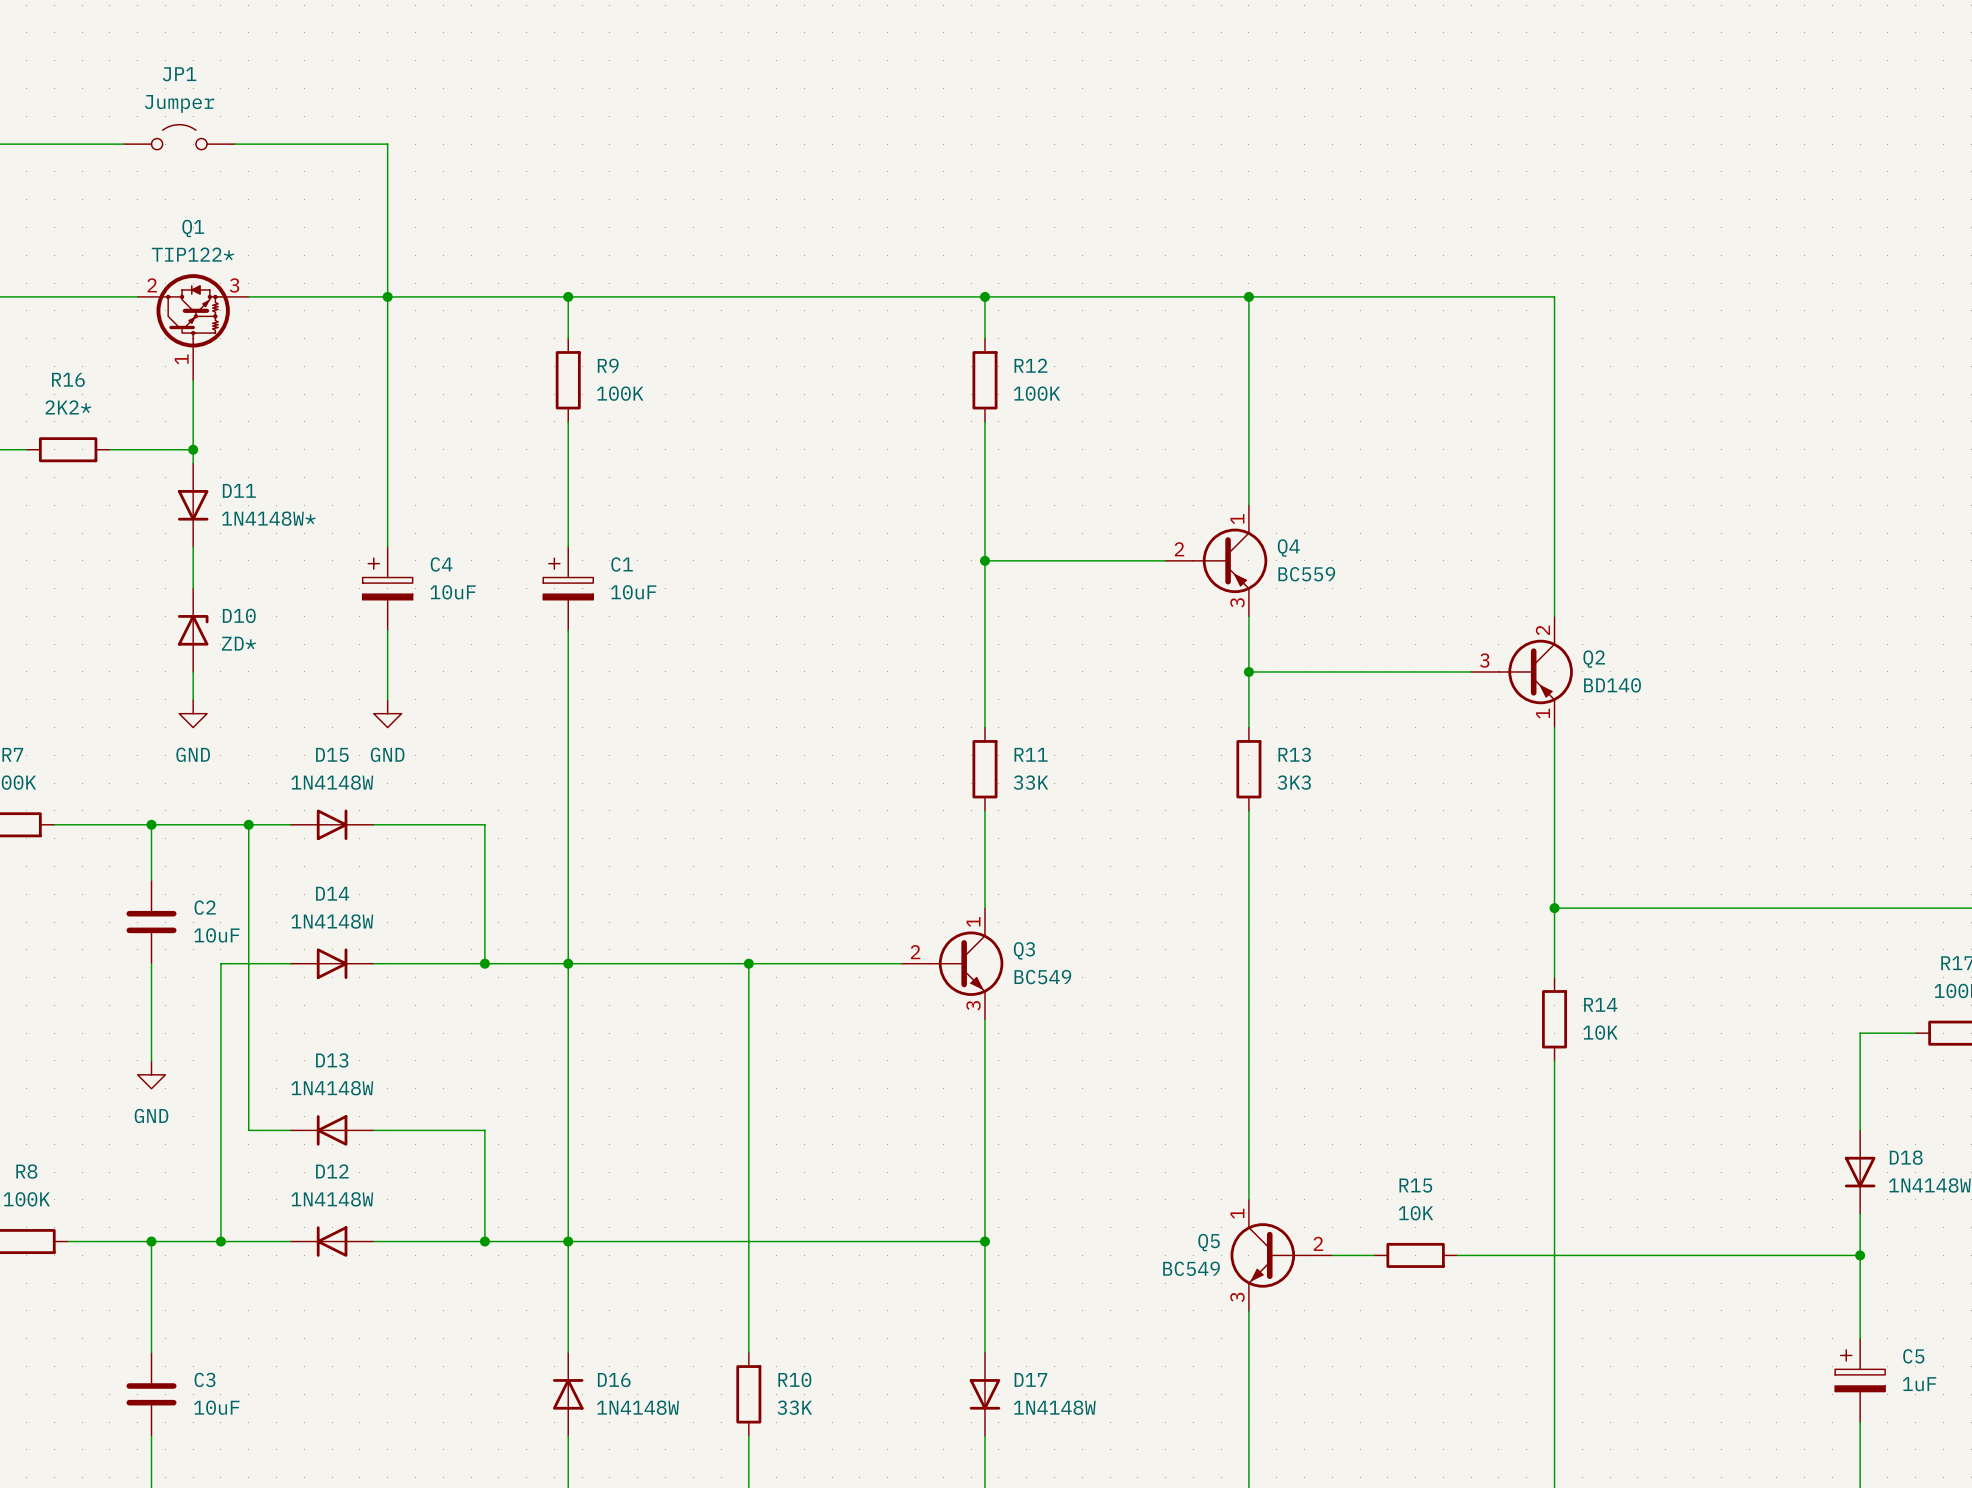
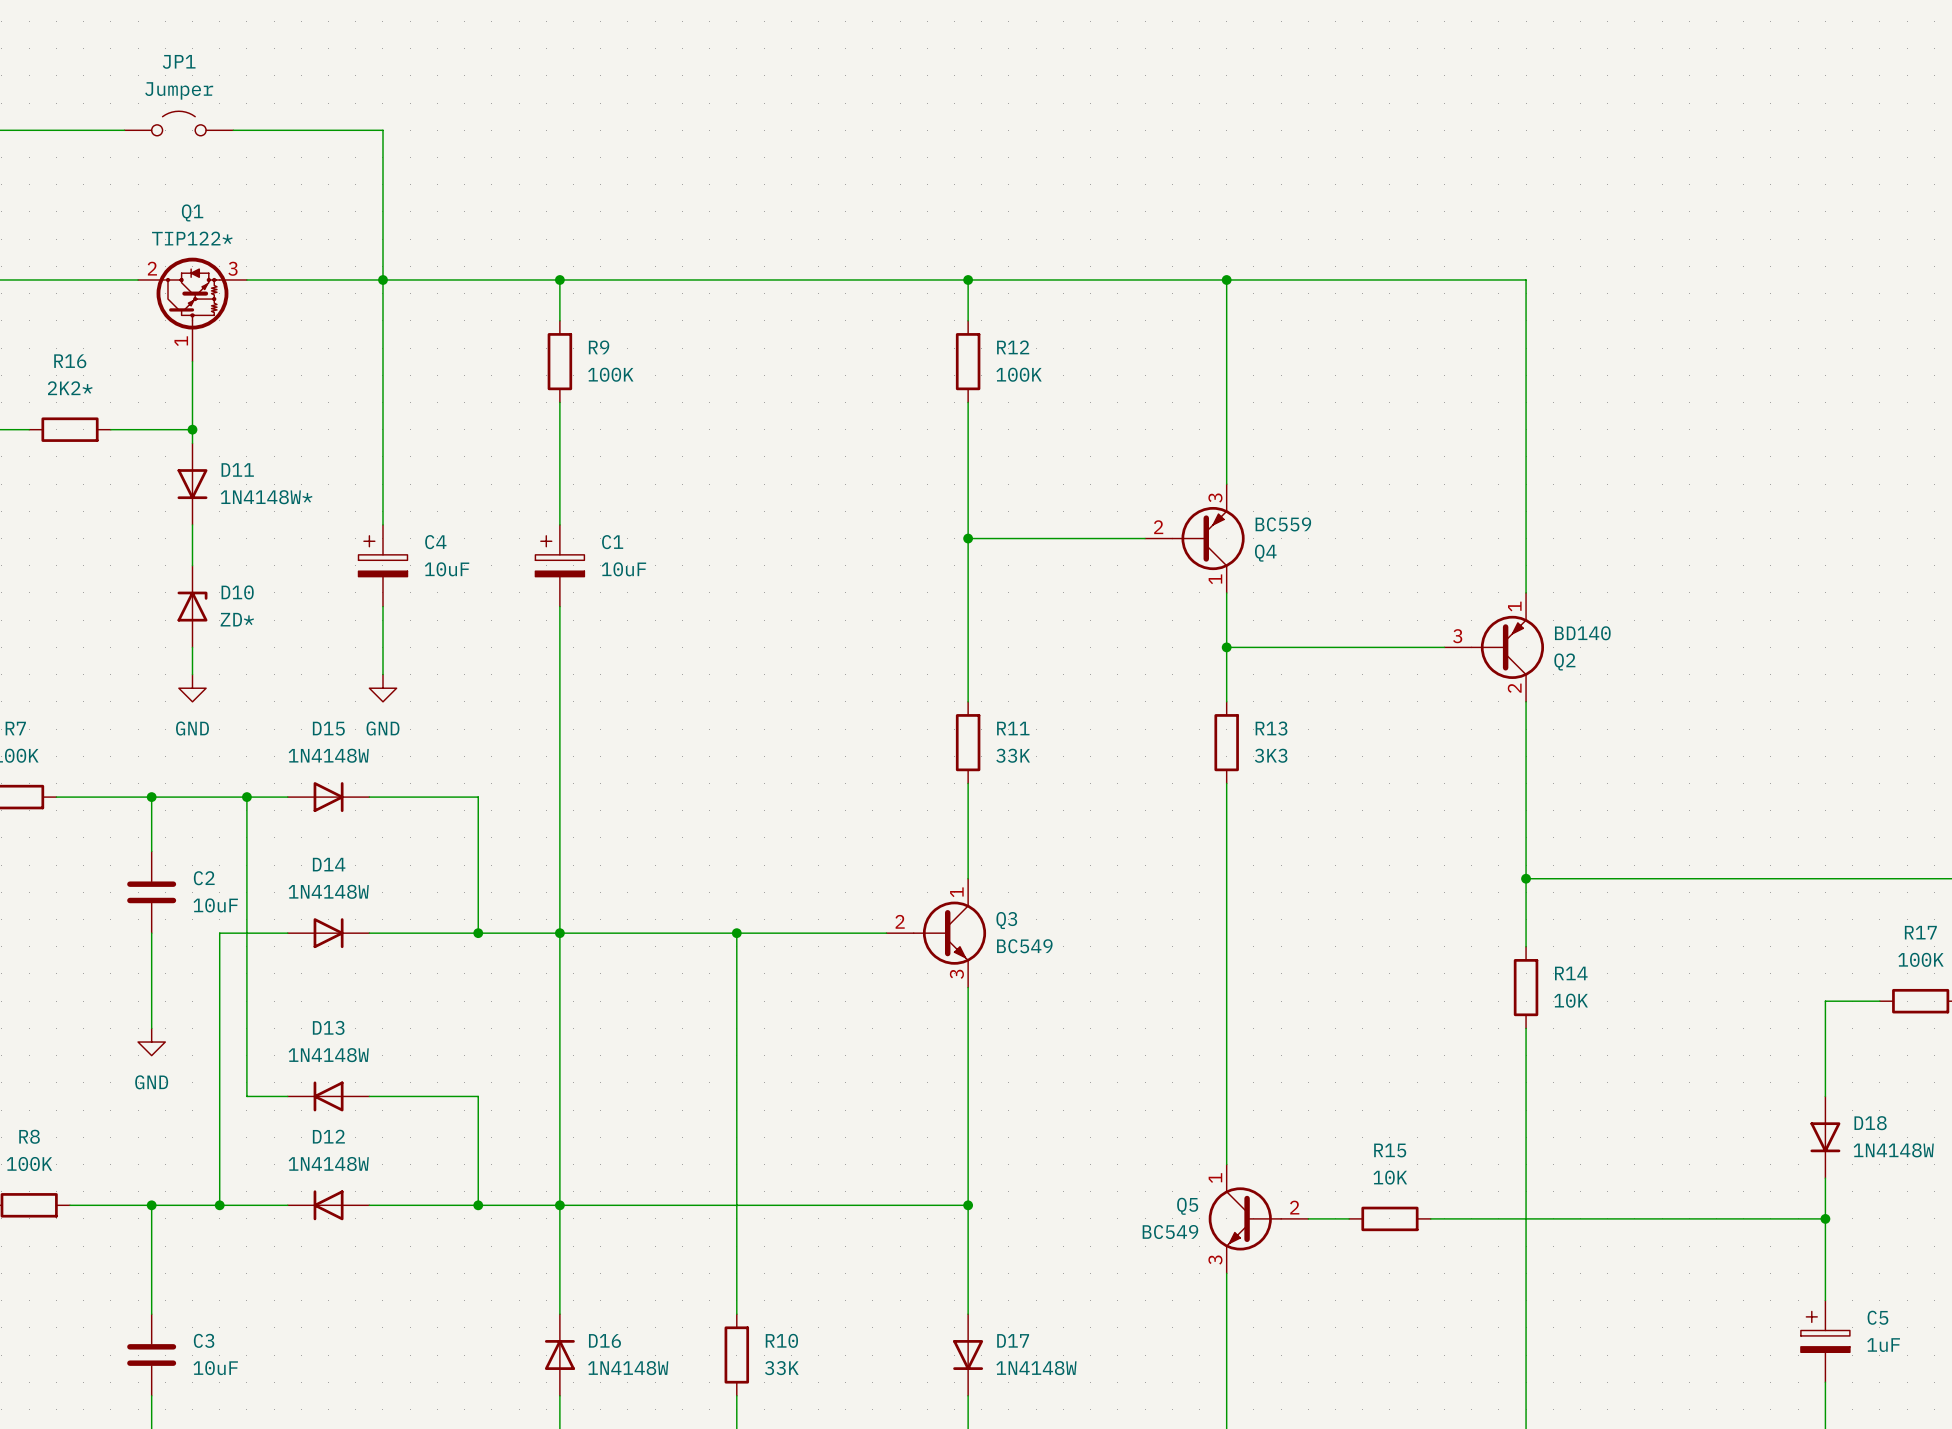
Q4 flip: as is (1230, 560) -> up-down (1208, 538)
Q2 flip: as is (1535, 671) -> up-down (1507, 647)

